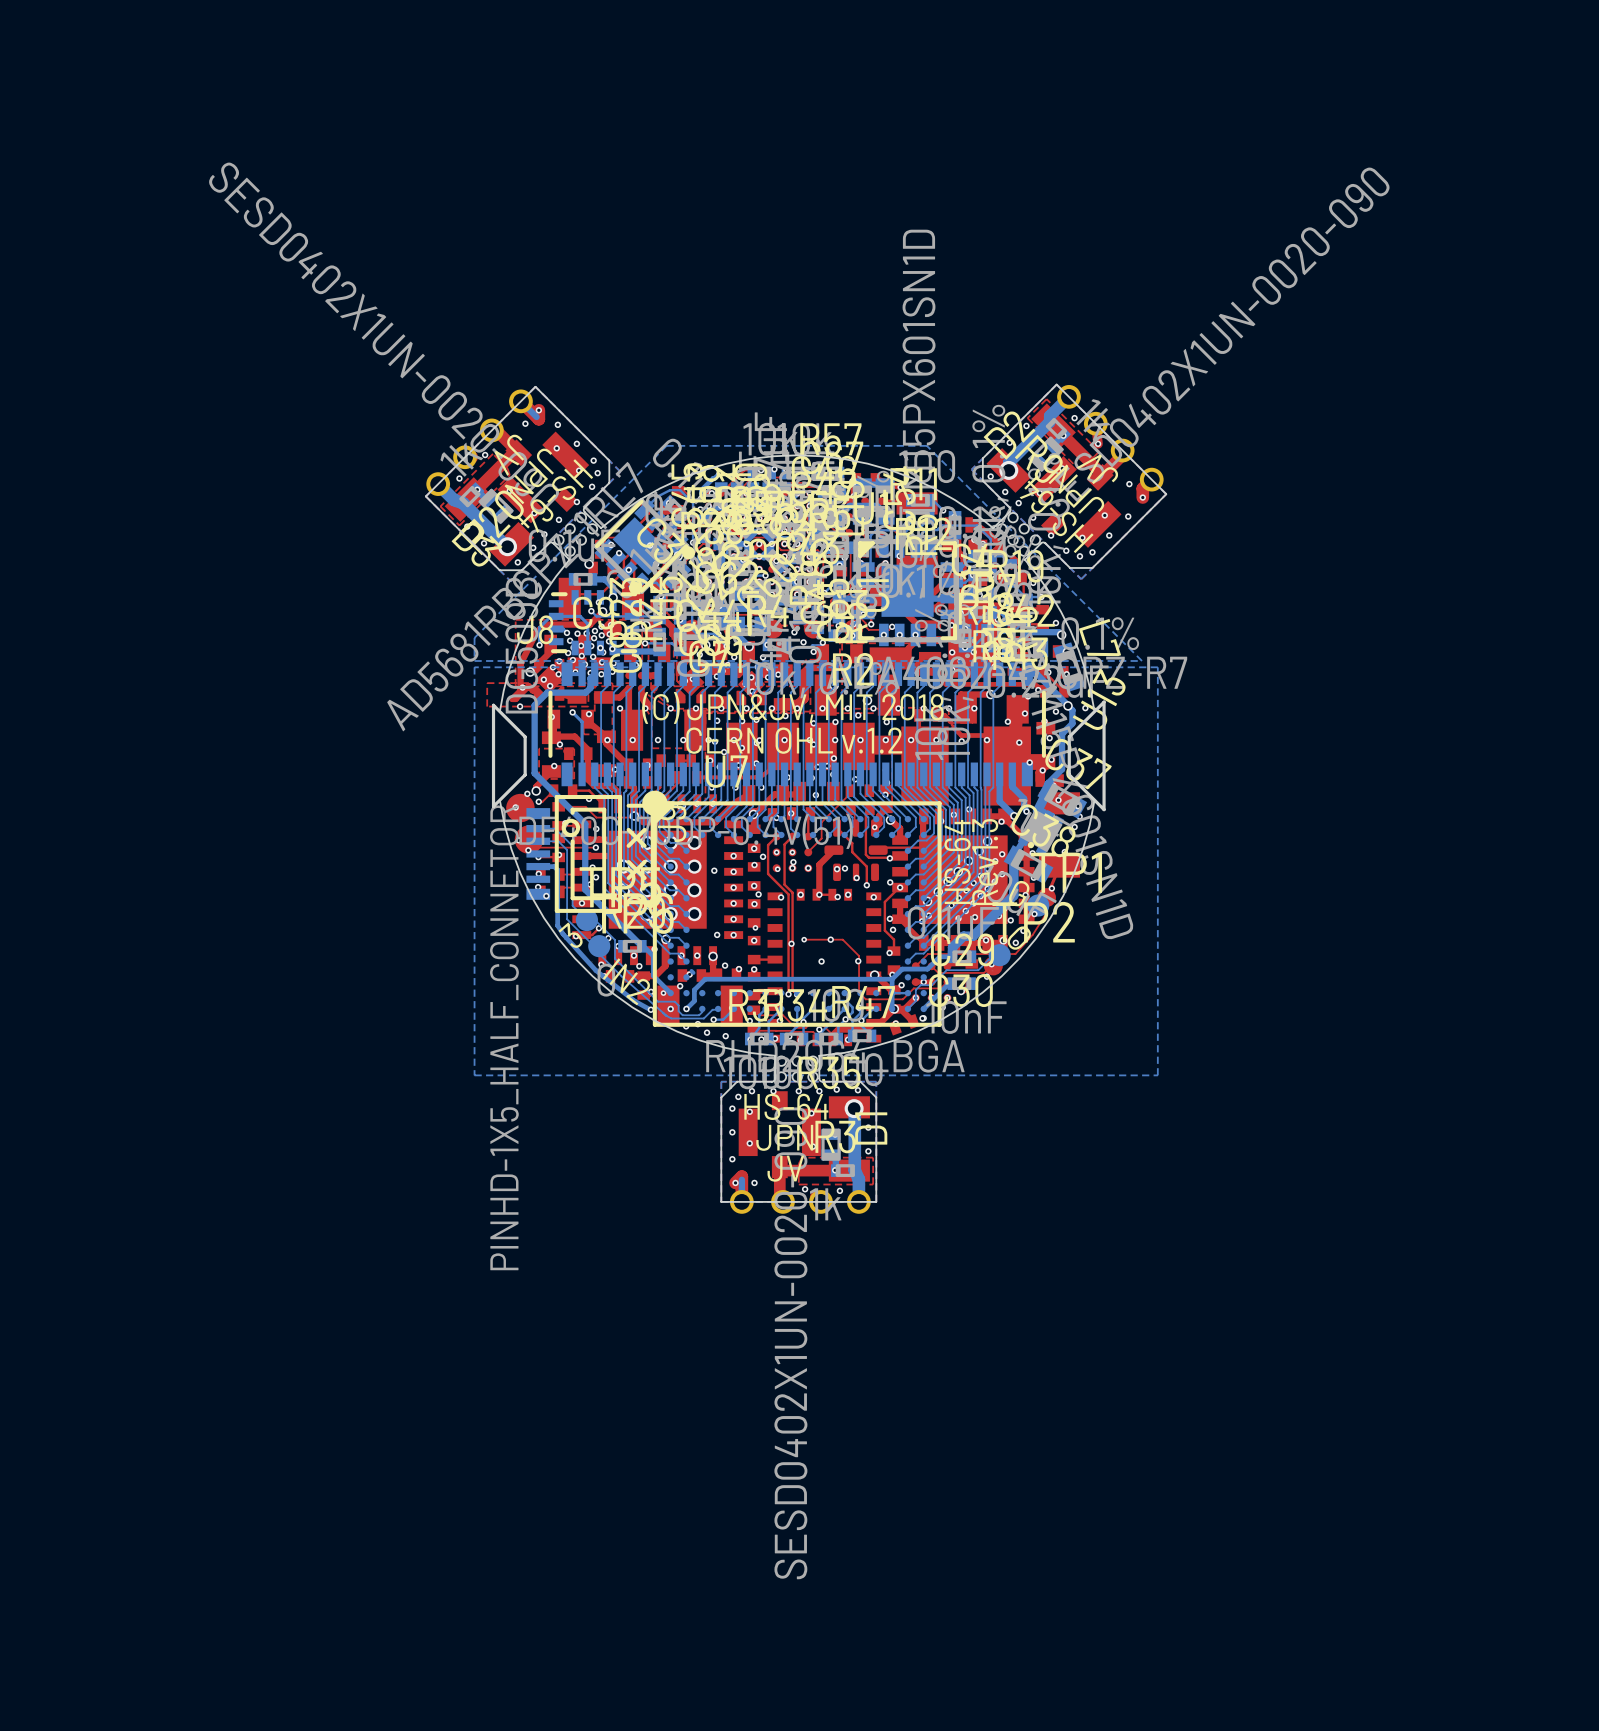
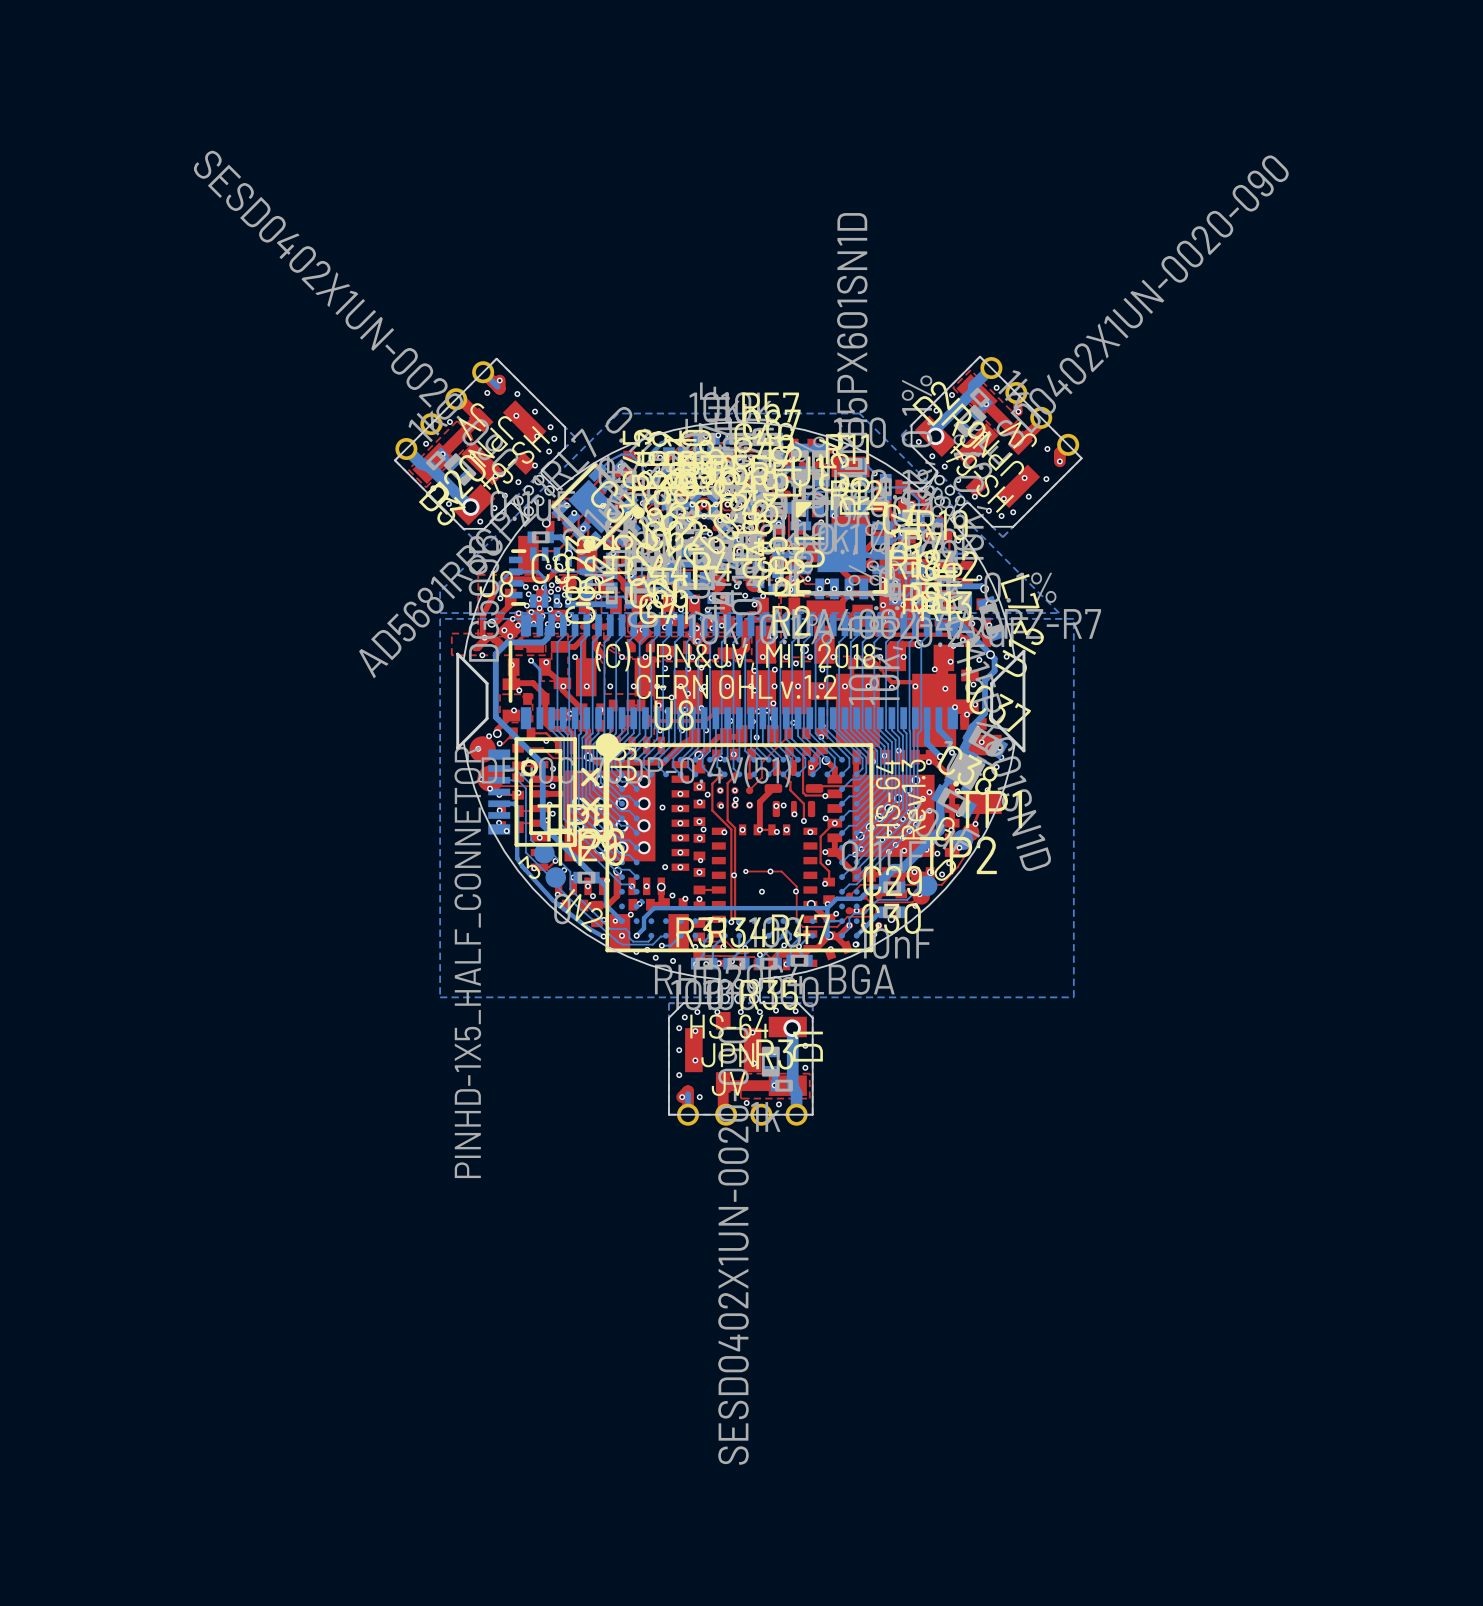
U7 name: U7 (726, 771) -> U8 (674, 715)

